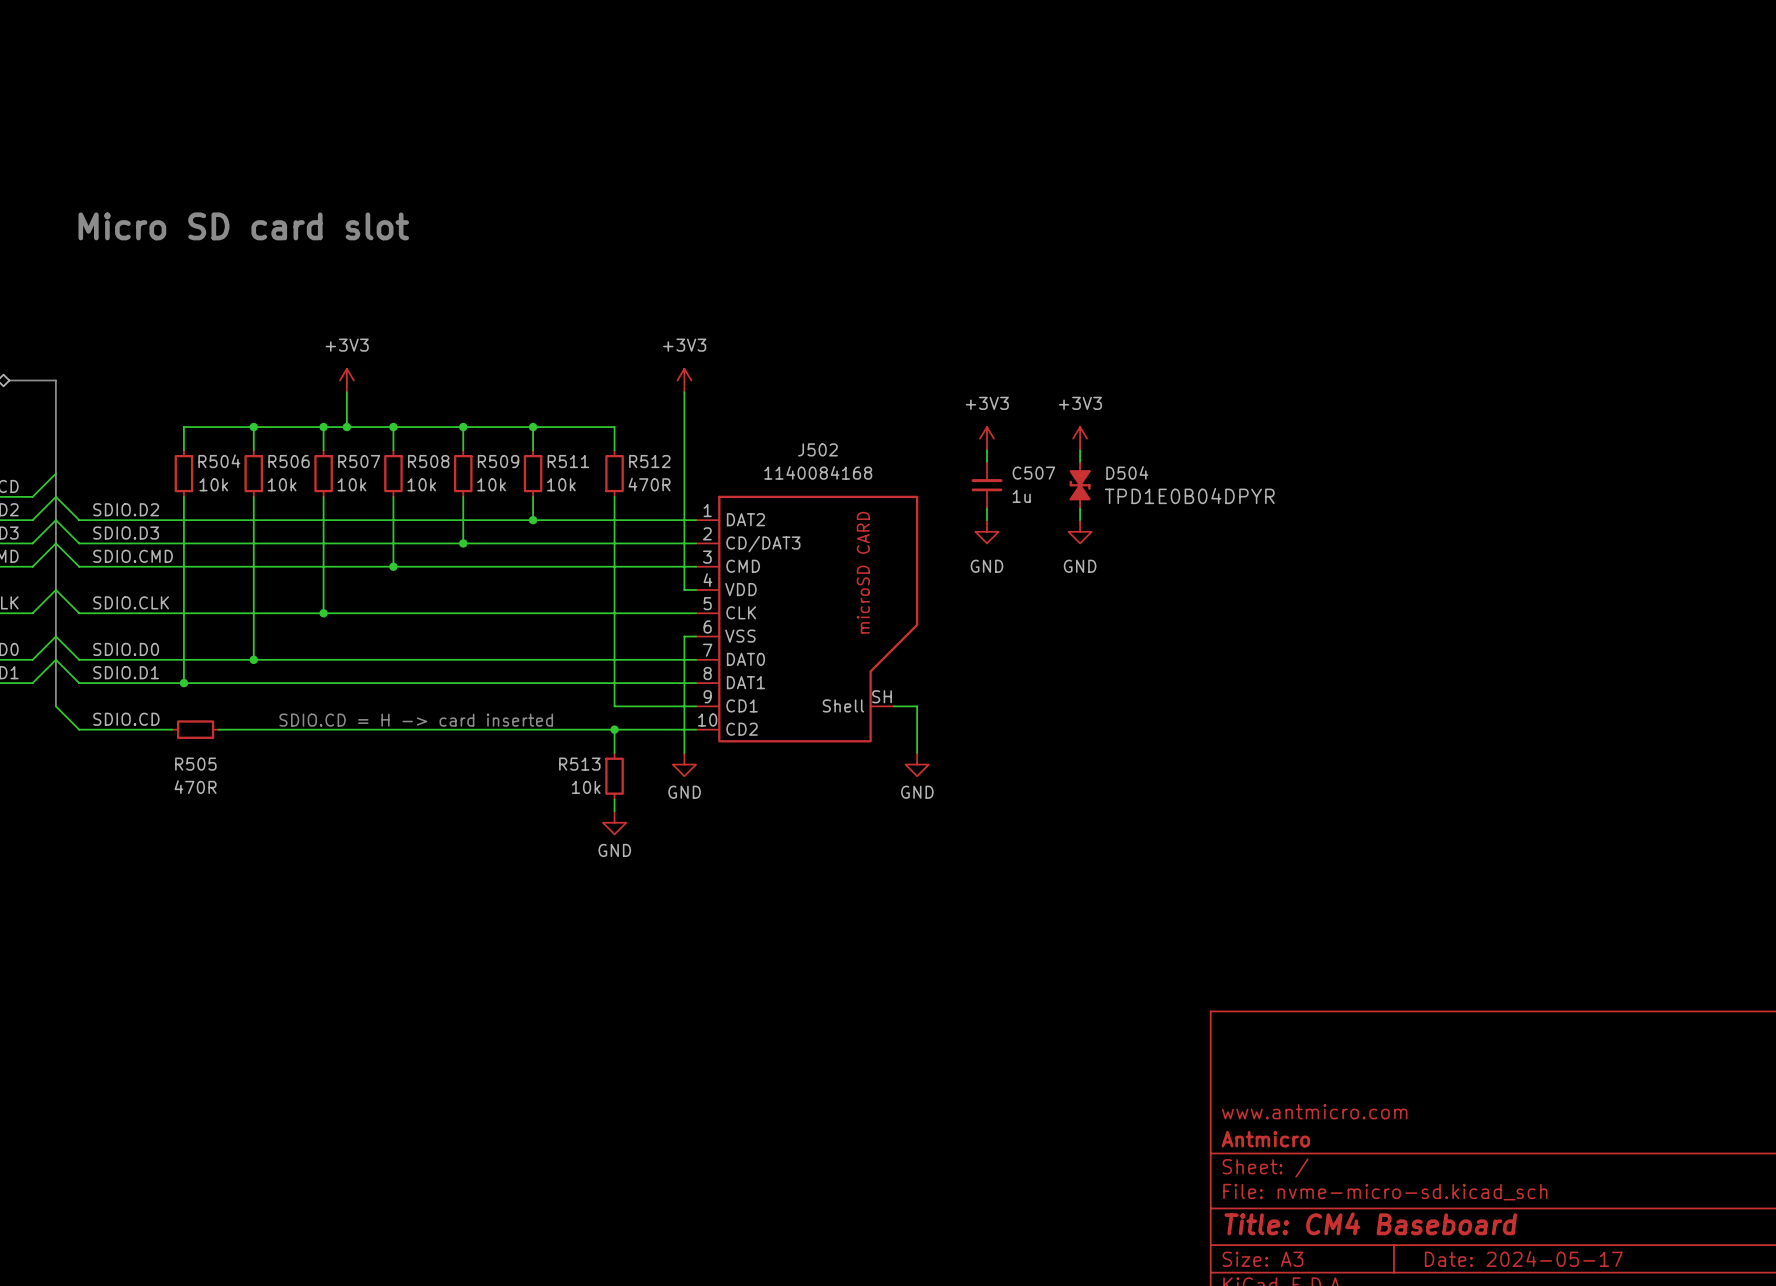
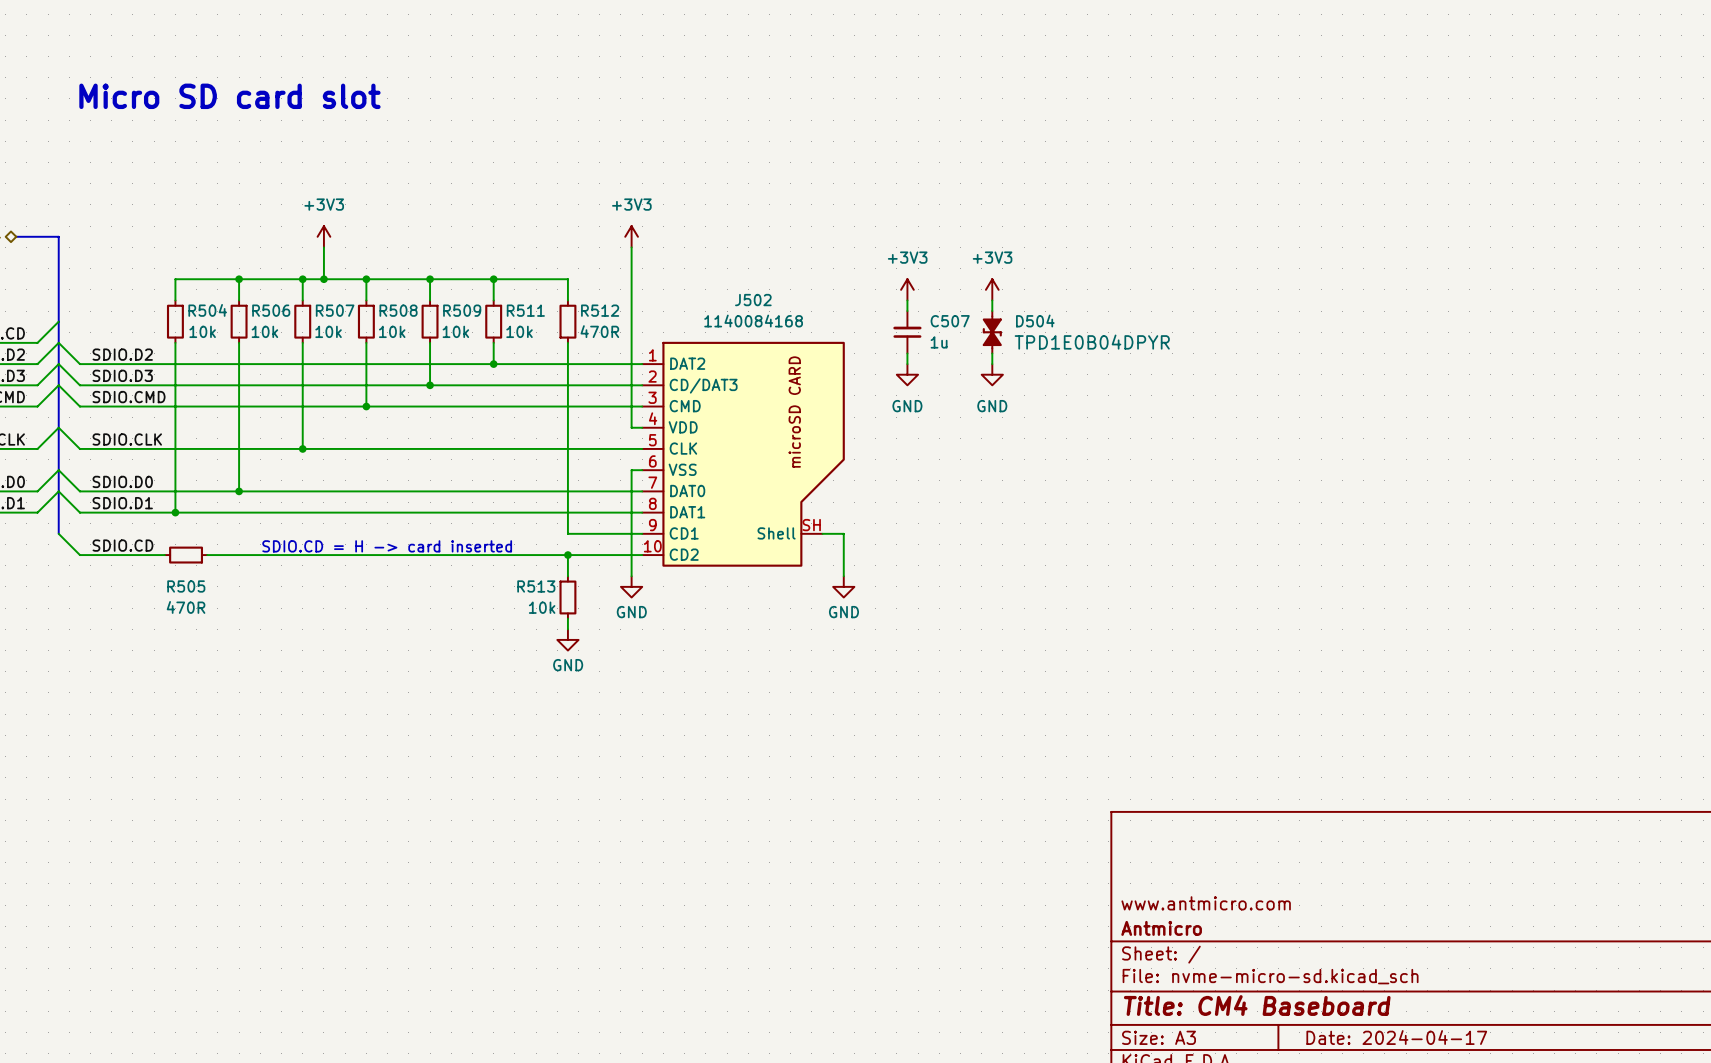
title block: Date: 2024-05-17 (1523, 1258) -> Date: 2024-04-17 (1396, 1037)

